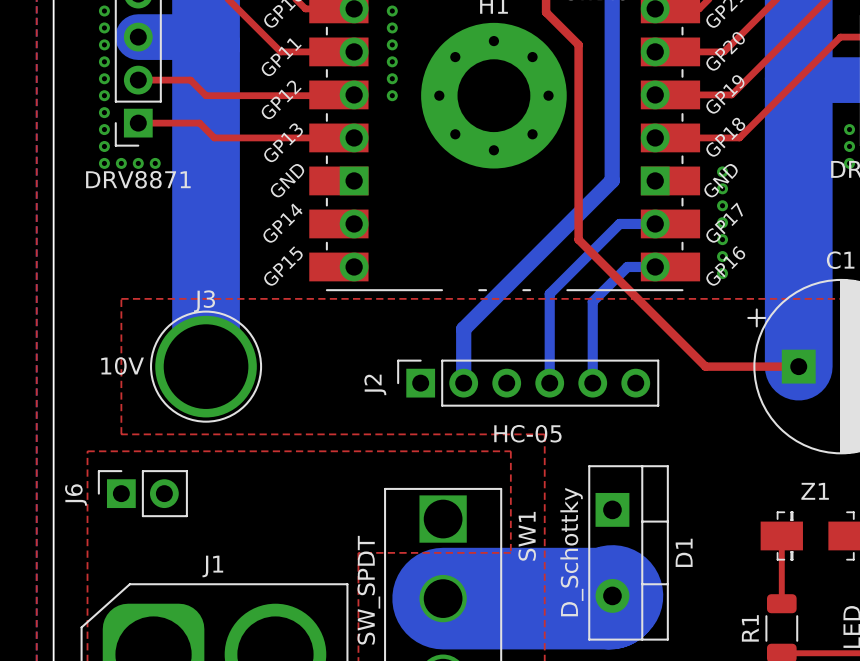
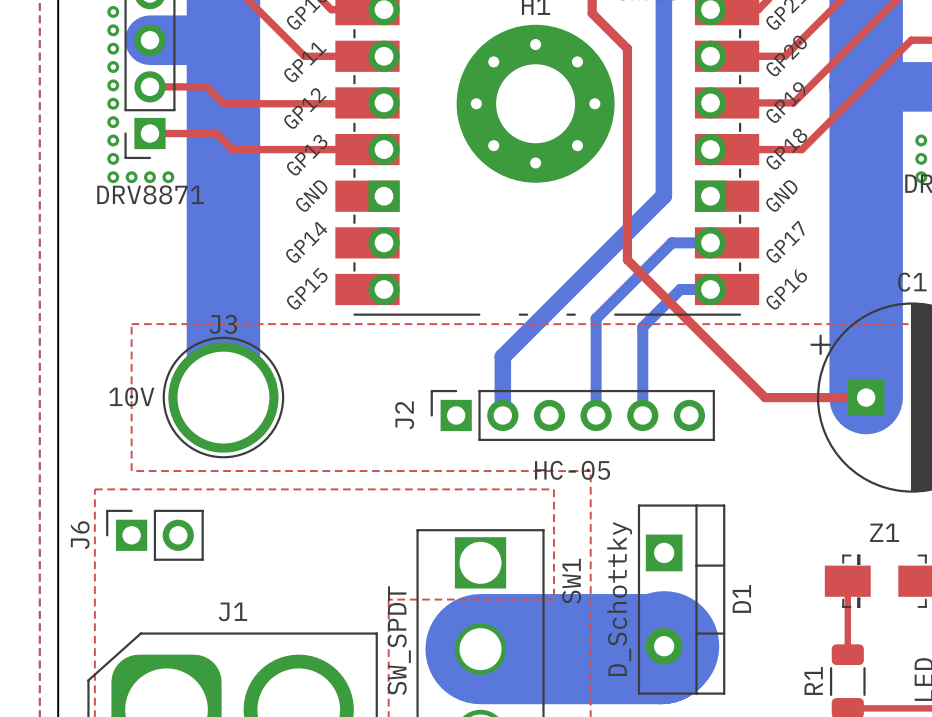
via: (392, 11) -> none
via: (392, 27) -> none
via: (392, 44) -> none
via: (392, 61) -> none
via: (392, 78) -> none
via: (392, 95) -> none
via: (722, 171) -> none
via: (722, 188) -> none
via: (722, 205) -> none
via: (722, 222) -> none
via: (722, 239) -> none
via: (722, 256) -> none
via: (722, 273) -> none

